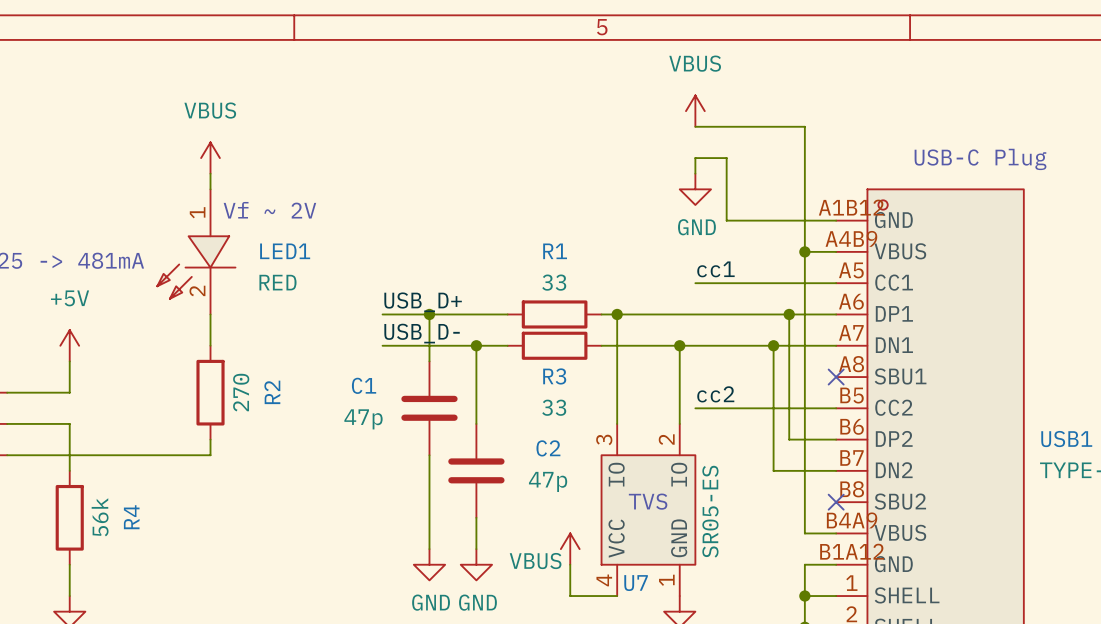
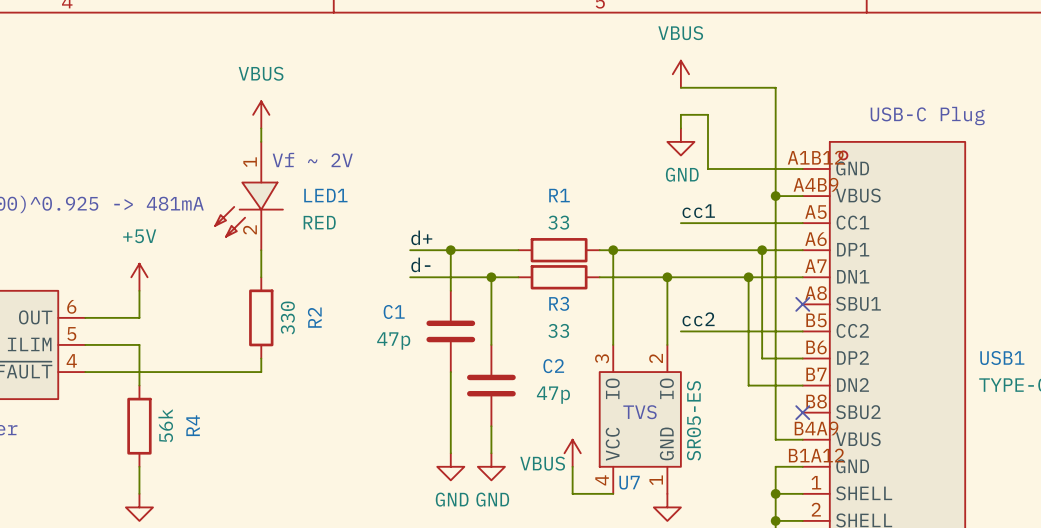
label: USB_D+ (423, 302) -> d+ (421, 237)
label: USB_D- (422, 333) -> d- (420, 264)
R2 value: 270 (241, 392) -> 330 (287, 317)

